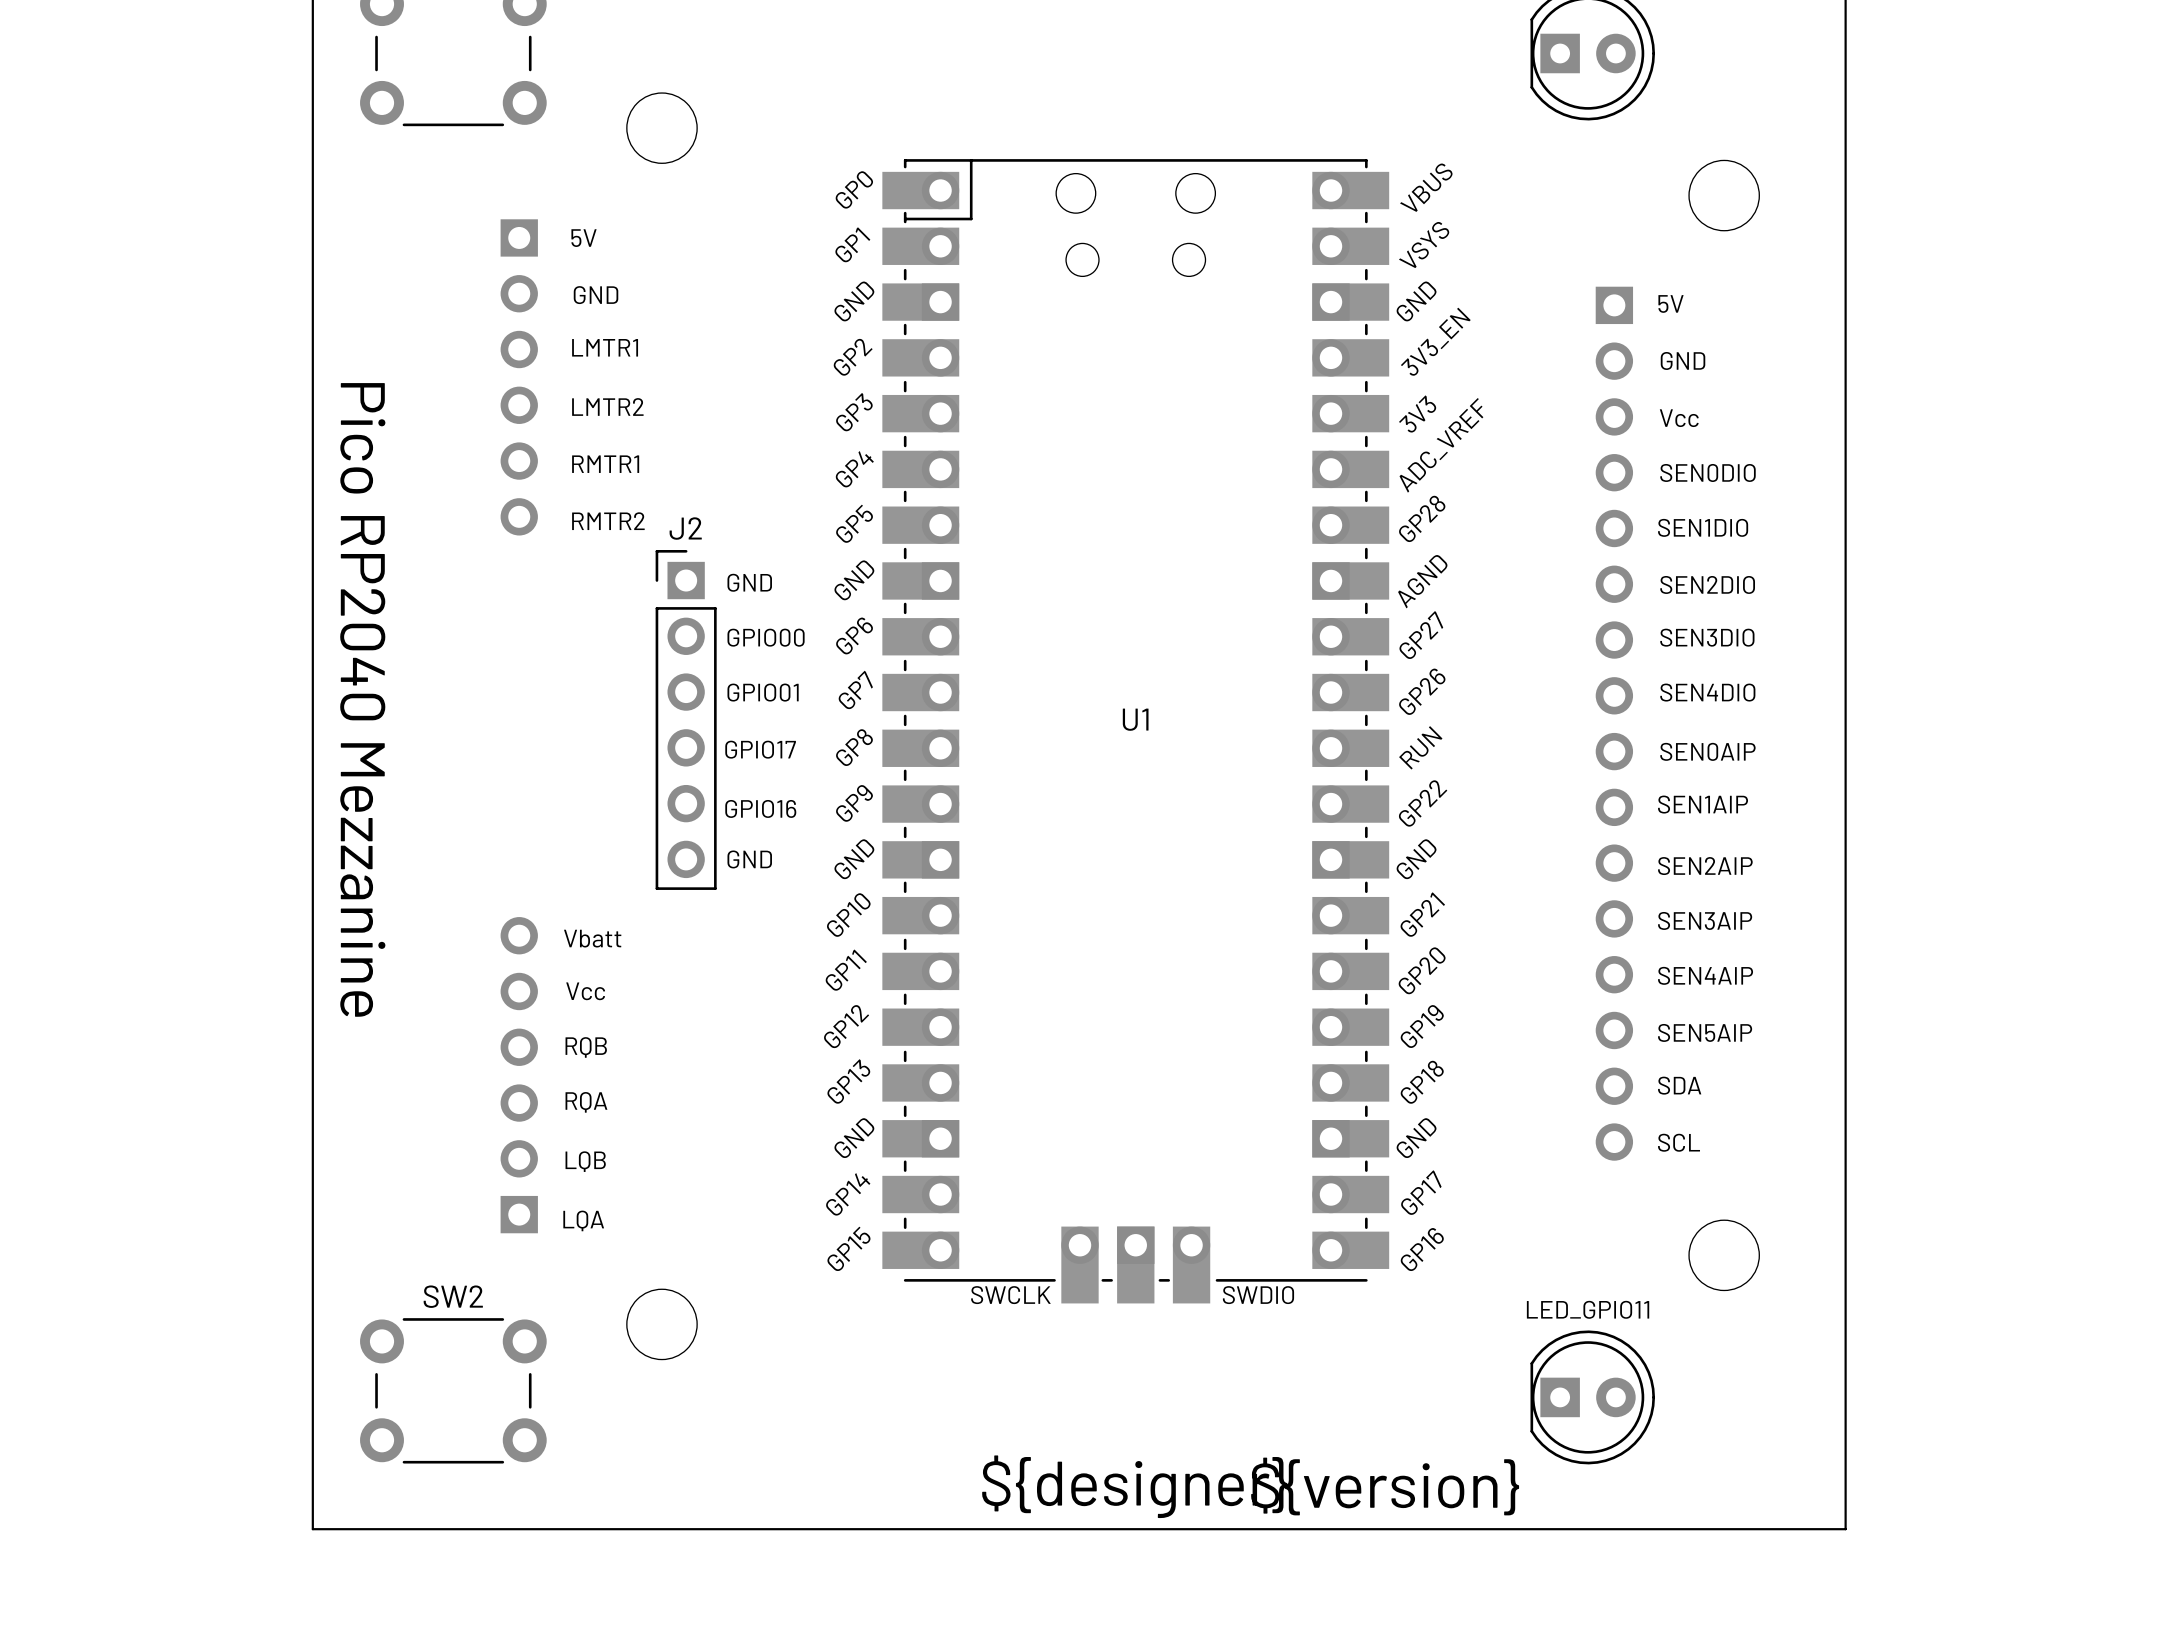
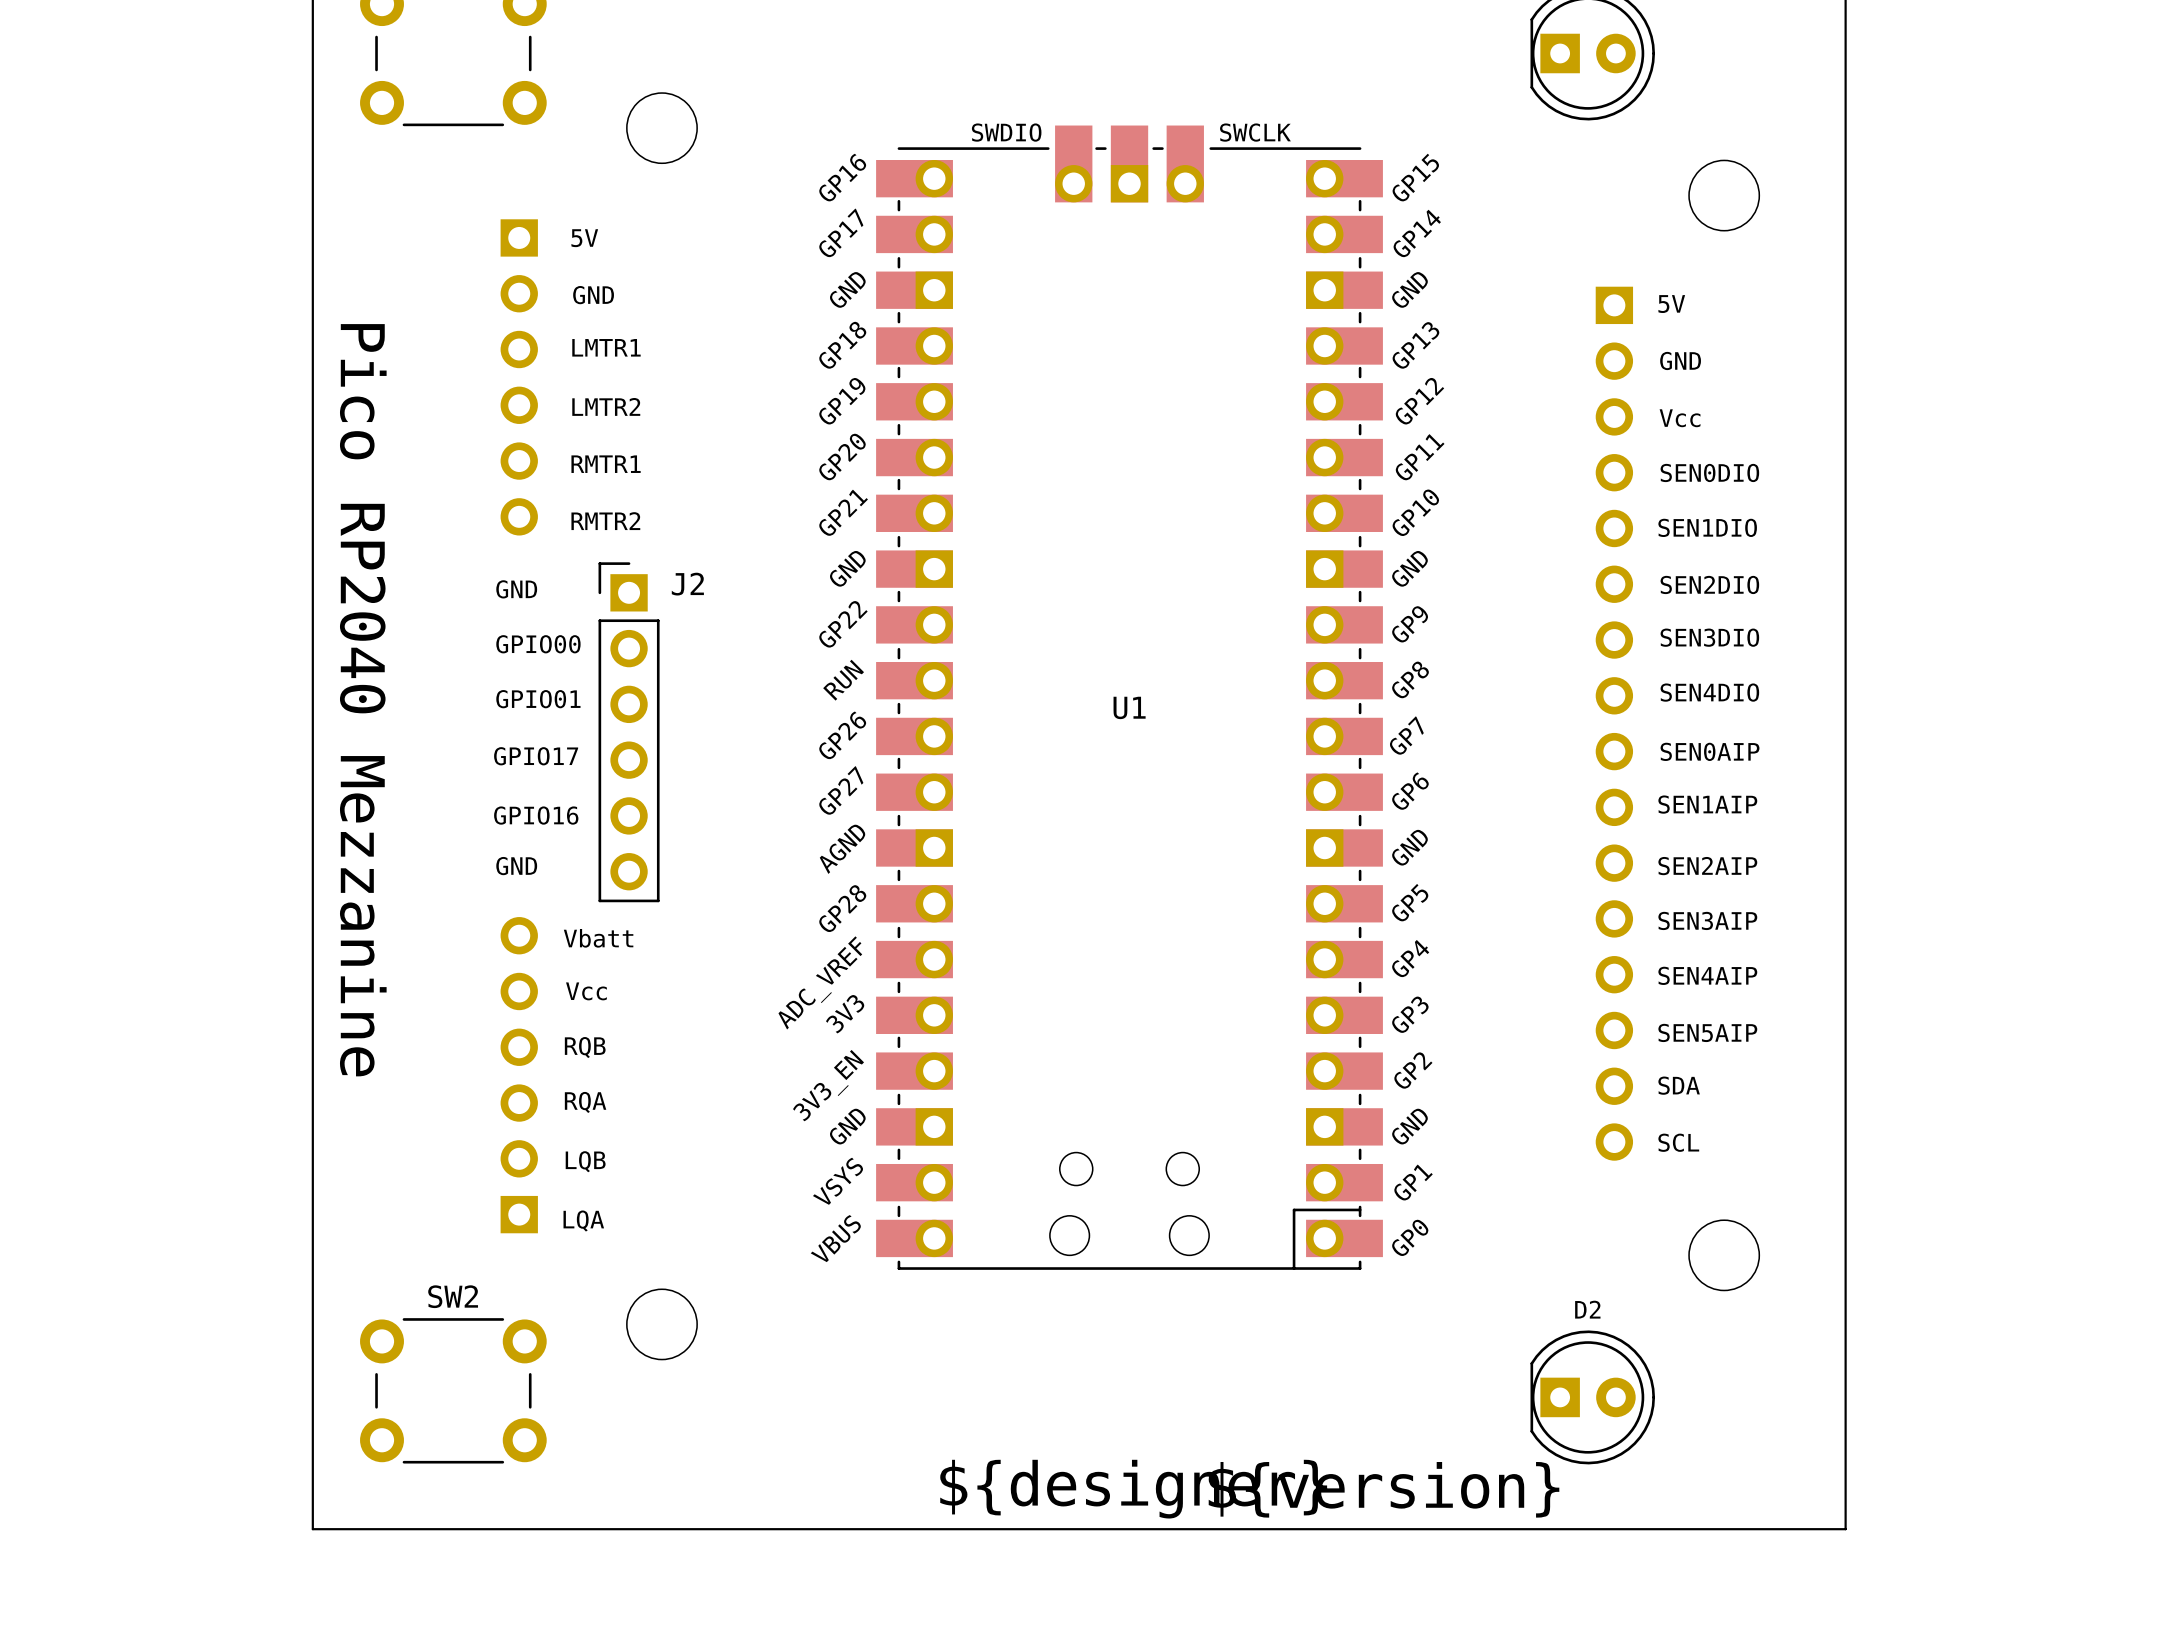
J2 name position: J2 (685, 528) -> J2 (687, 584)
text: GND (749, 582) -> none
text: none -> GND (516, 589)
text position: GPIO00 (766, 637) -> GPIO00 (538, 644)
text position: GPIO01 (763, 692) -> GPIO01 (538, 699)
J2 position: (686, 719) -> (629, 732)
U1 rotation: 0° (1135, 731) -> 180° (1129, 697)
text position: GPIO17 (760, 749) -> GPIO17 (536, 756)
text position: GPIO16 (760, 808) -> GPIO16 (536, 815)
text: GND (749, 859) -> none
text: none -> GND (516, 866)
LED_GPIO11 name: LED_GPIO11 (1588, 1309) -> D2 (1587, 1309)

